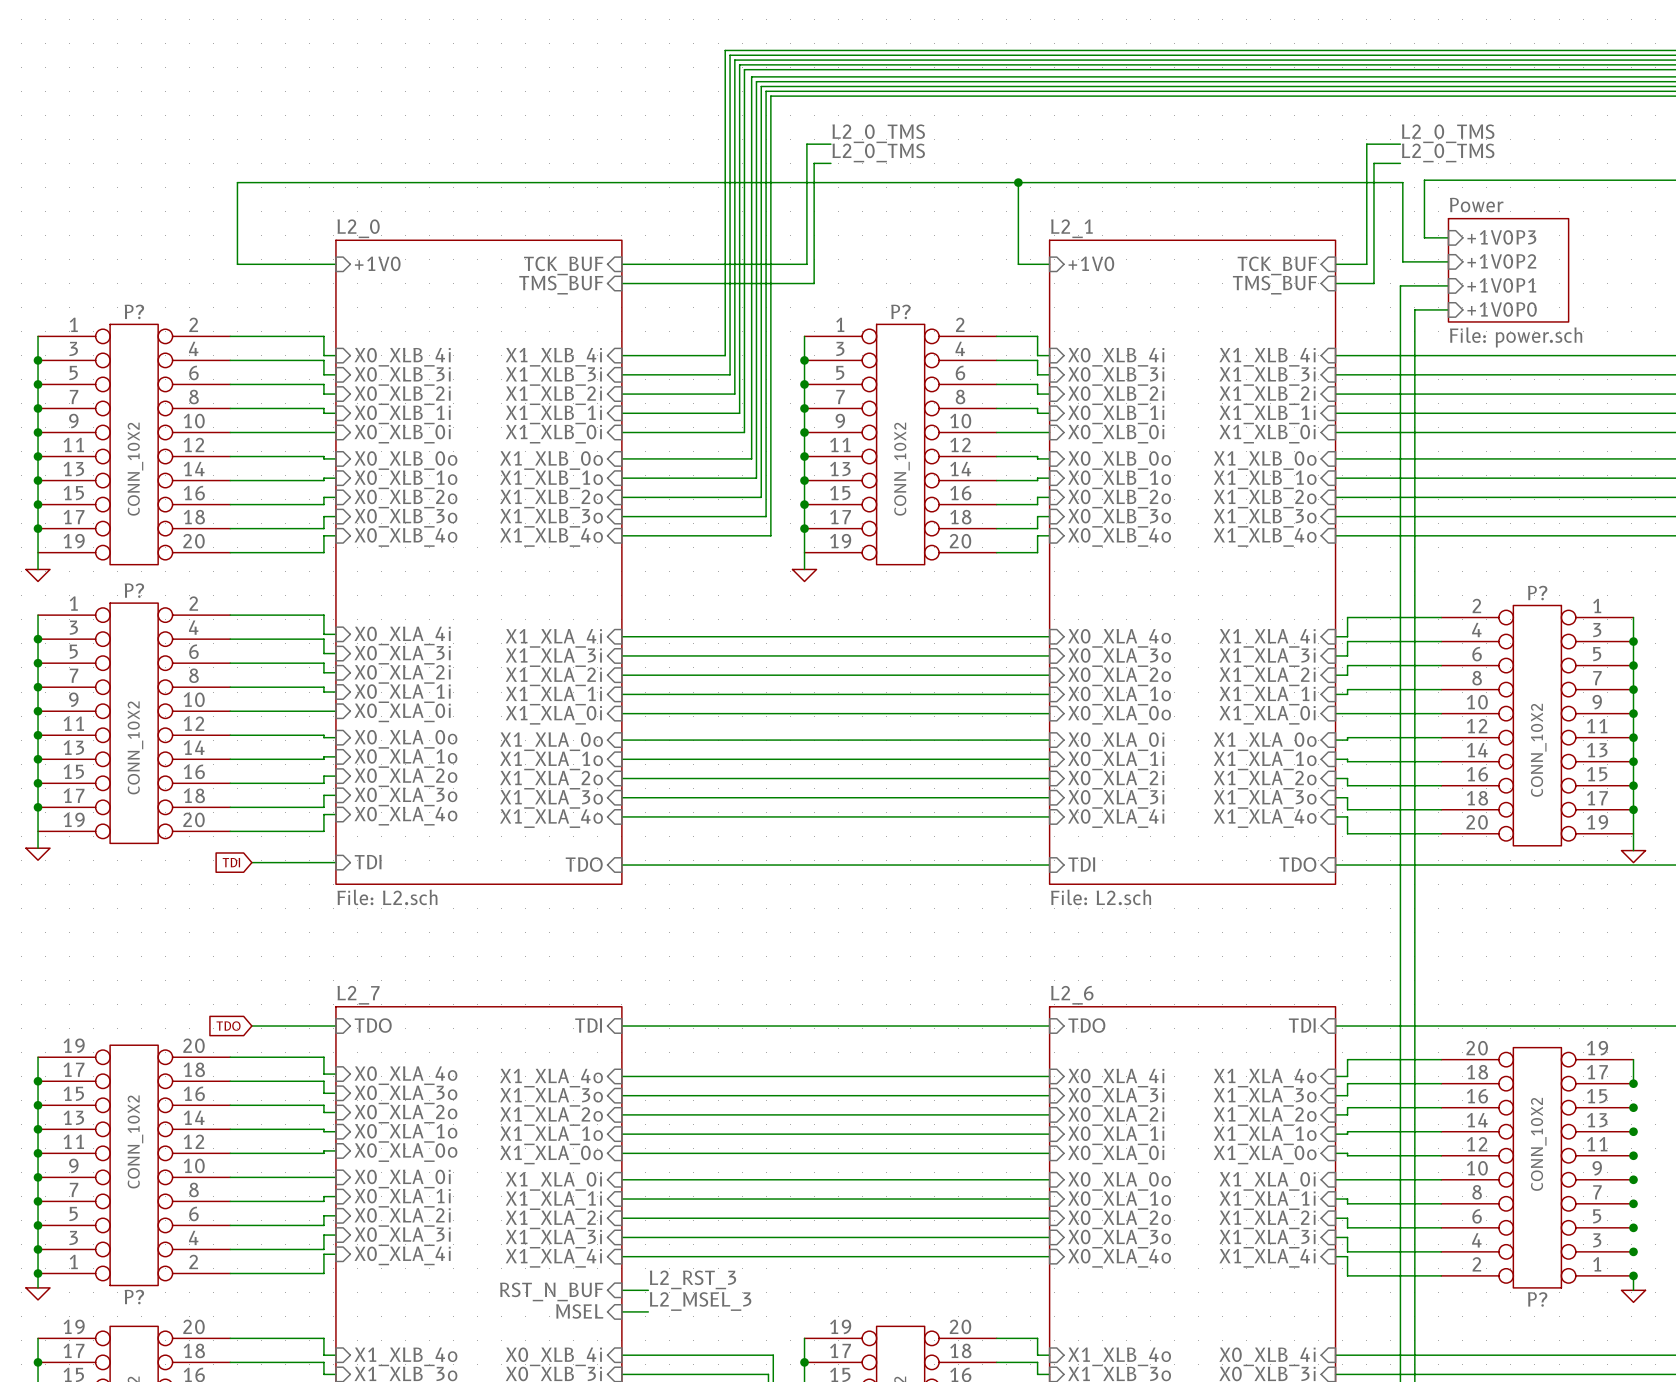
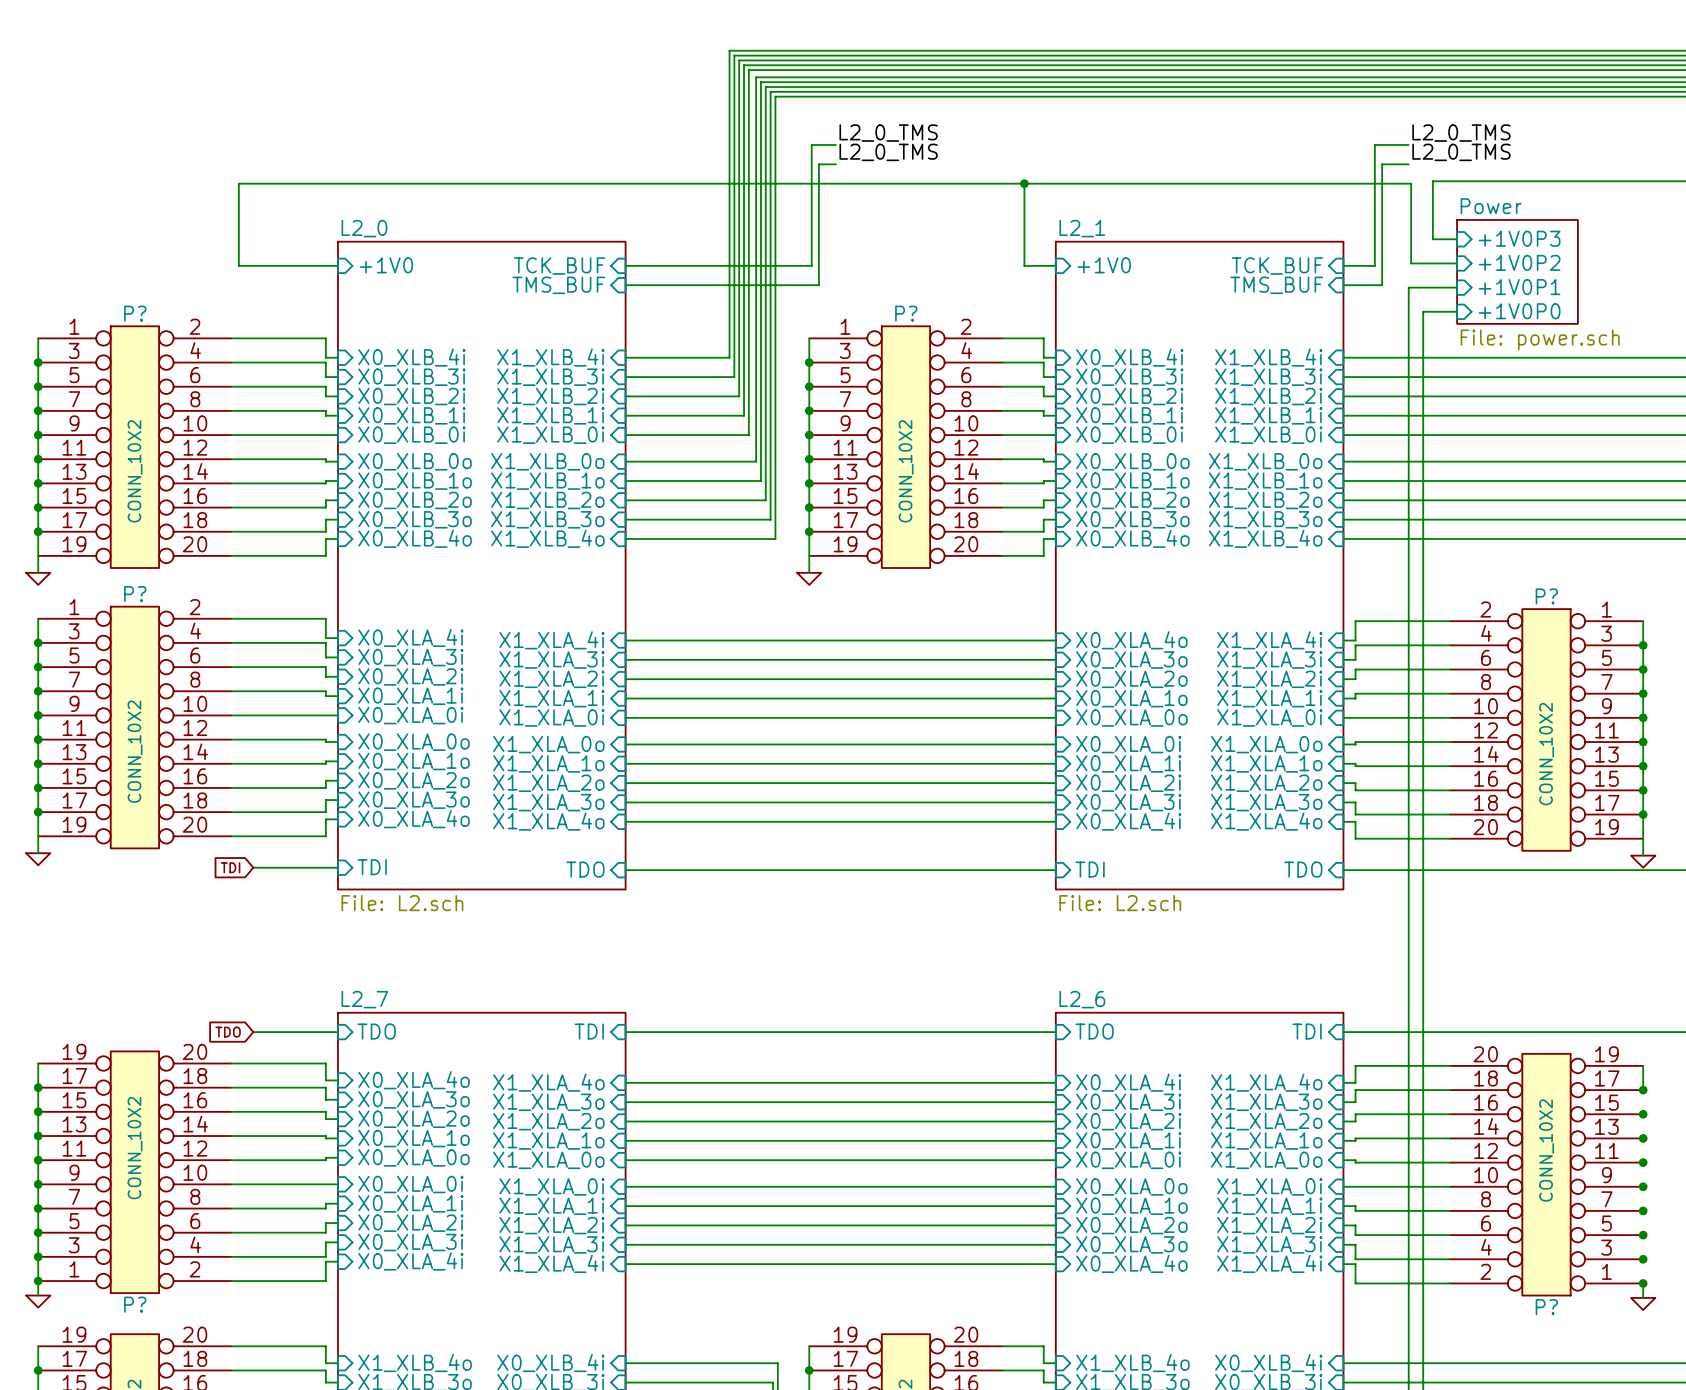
label: L2_RST_3 (693, 1279) -> none
wire: (621, 1290) (648, 1290) -> none
sheet pin: RST_N_BUF (551, 1291) -> none
label: L2_MSEL_3 (700, 1301) -> none
sheet pin: MSEL (579, 1311) -> none
wire: (621, 1311) (648, 1311) -> none

